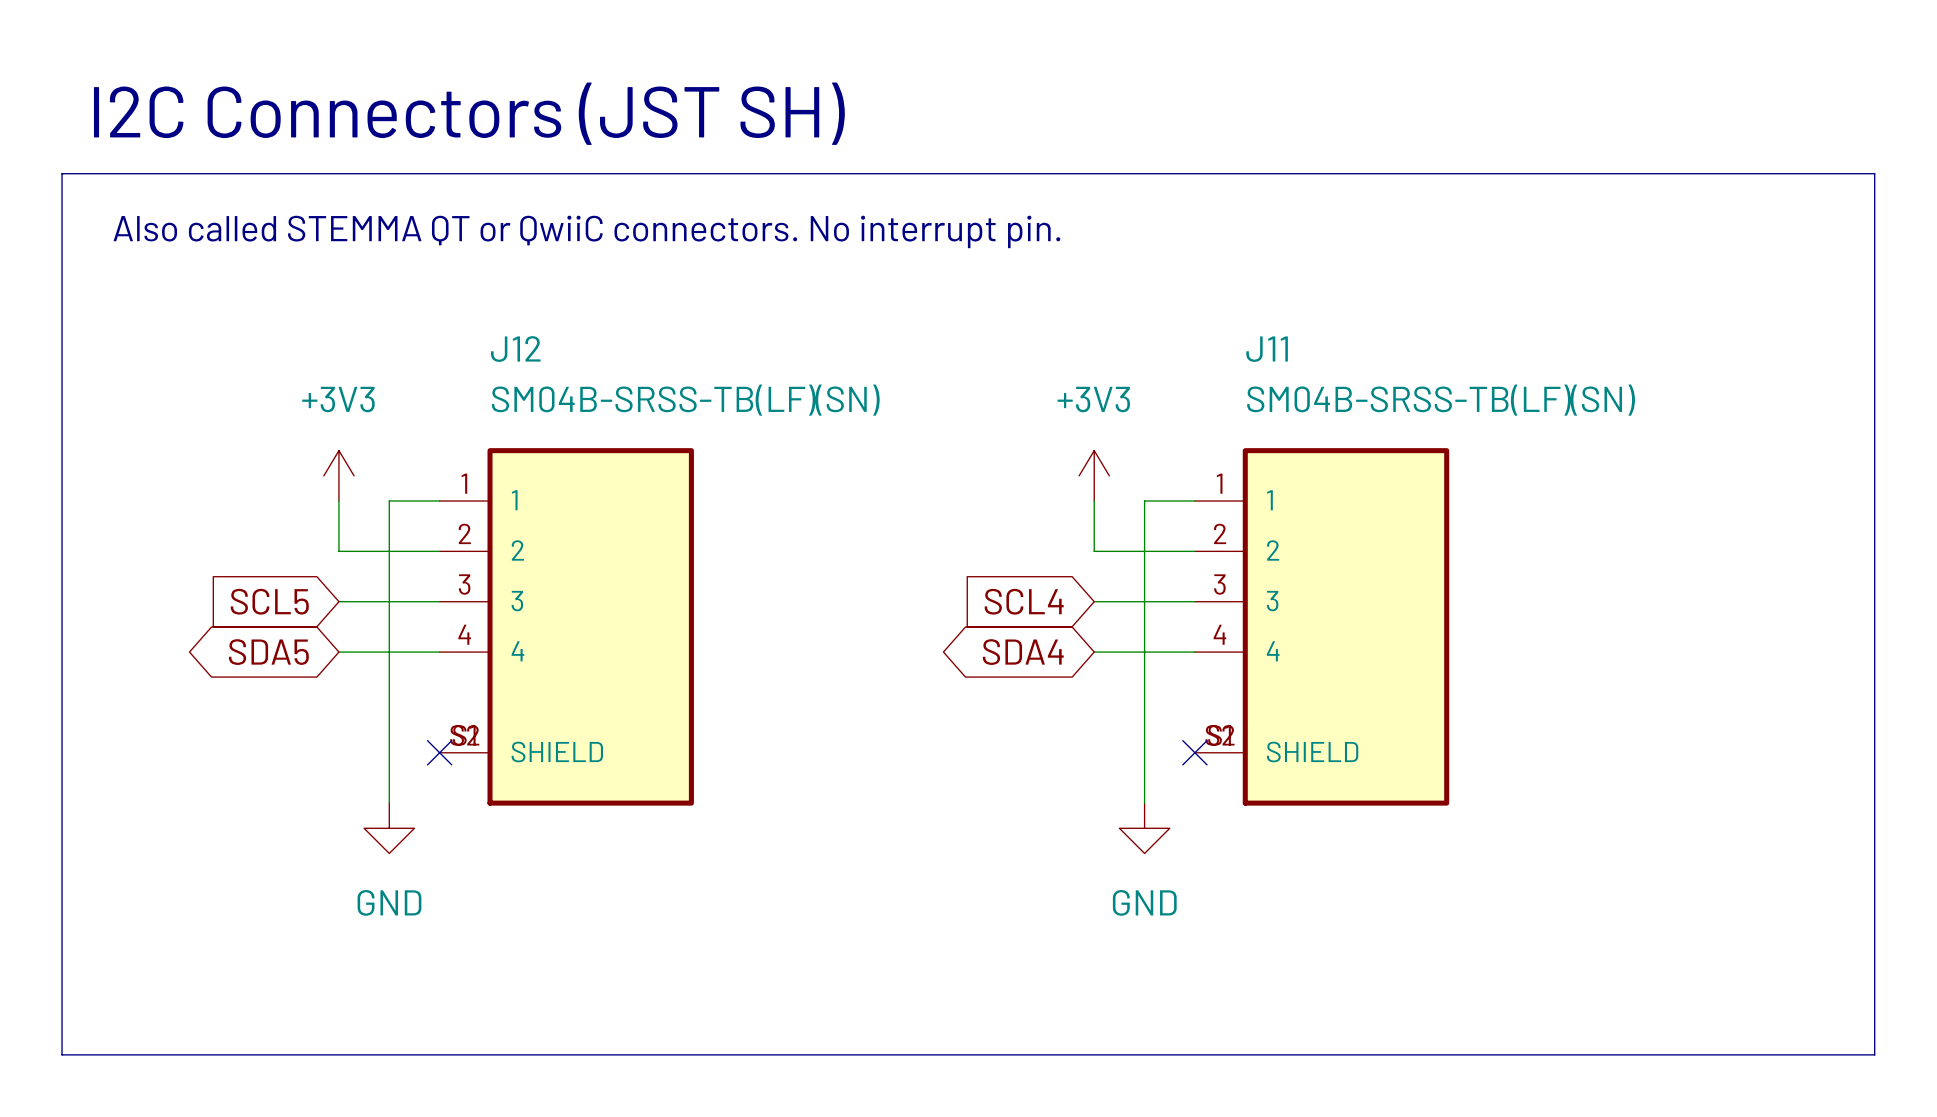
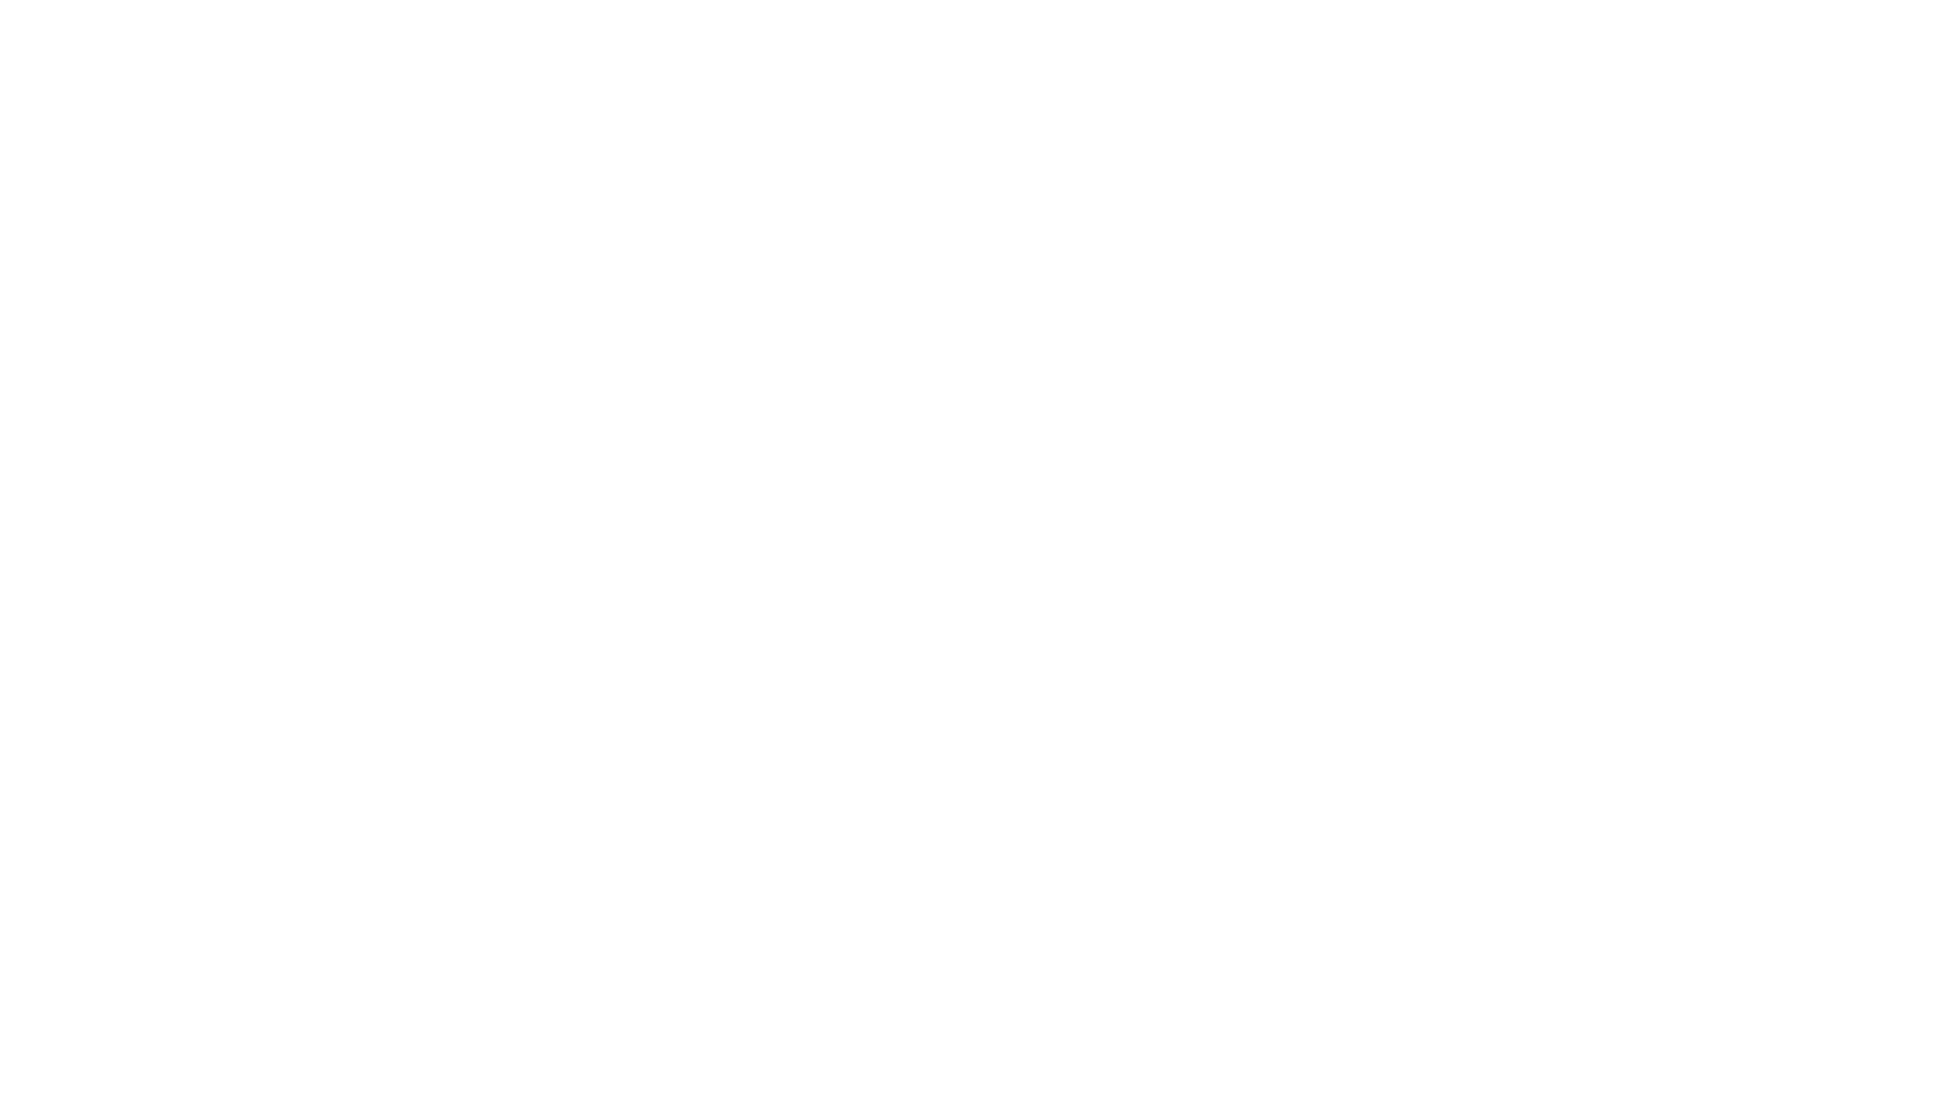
text: I2C Connectors (JST SH) (469, 113) -> none
line: (62, 173) (1874, 173) (1874, 1054) (62, 1054) (62, 173) -> none
text: Also called STEMMA QT or QwiiC connectors. No interrupt pin. (586, 231) -> none
power symbol: +3V3 (338, 475) -> none
power symbol: +3V3 (1094, 475) -> none
wire: (338, 501) (338, 551) (439, 551) -> none
wire: (439, 501) (389, 501) (389, 803) -> none
wire: (1094, 501) (1094, 551) (1194, 551) -> none
wire: (1194, 501) (1144, 501) (1144, 803) -> none
global label: SCL5 (269, 601) -> none
wire: (338, 601) (439, 601) -> none
global label: SCL4 (1024, 601) -> none
wire: (1094, 601) (1194, 601) -> none
J12: SM04B-SRSS-TB(LF)(SN) (566, 626) -> none
J11: SM04B-SRSS-TB(LF)(SN) (1322, 626) -> none
global label: SDA5 (268, 652) -> none
wire: (338, 652) (439, 652) -> none
global label: SDA4 (1023, 652) -> none
wire: (1094, 652) (1194, 652) -> none
no-connect mark: (439, 752) -> none
no-connect mark: (1194, 752) -> none
power symbol: GND (389, 828) -> none
power symbol: GND (1144, 828) -> none

